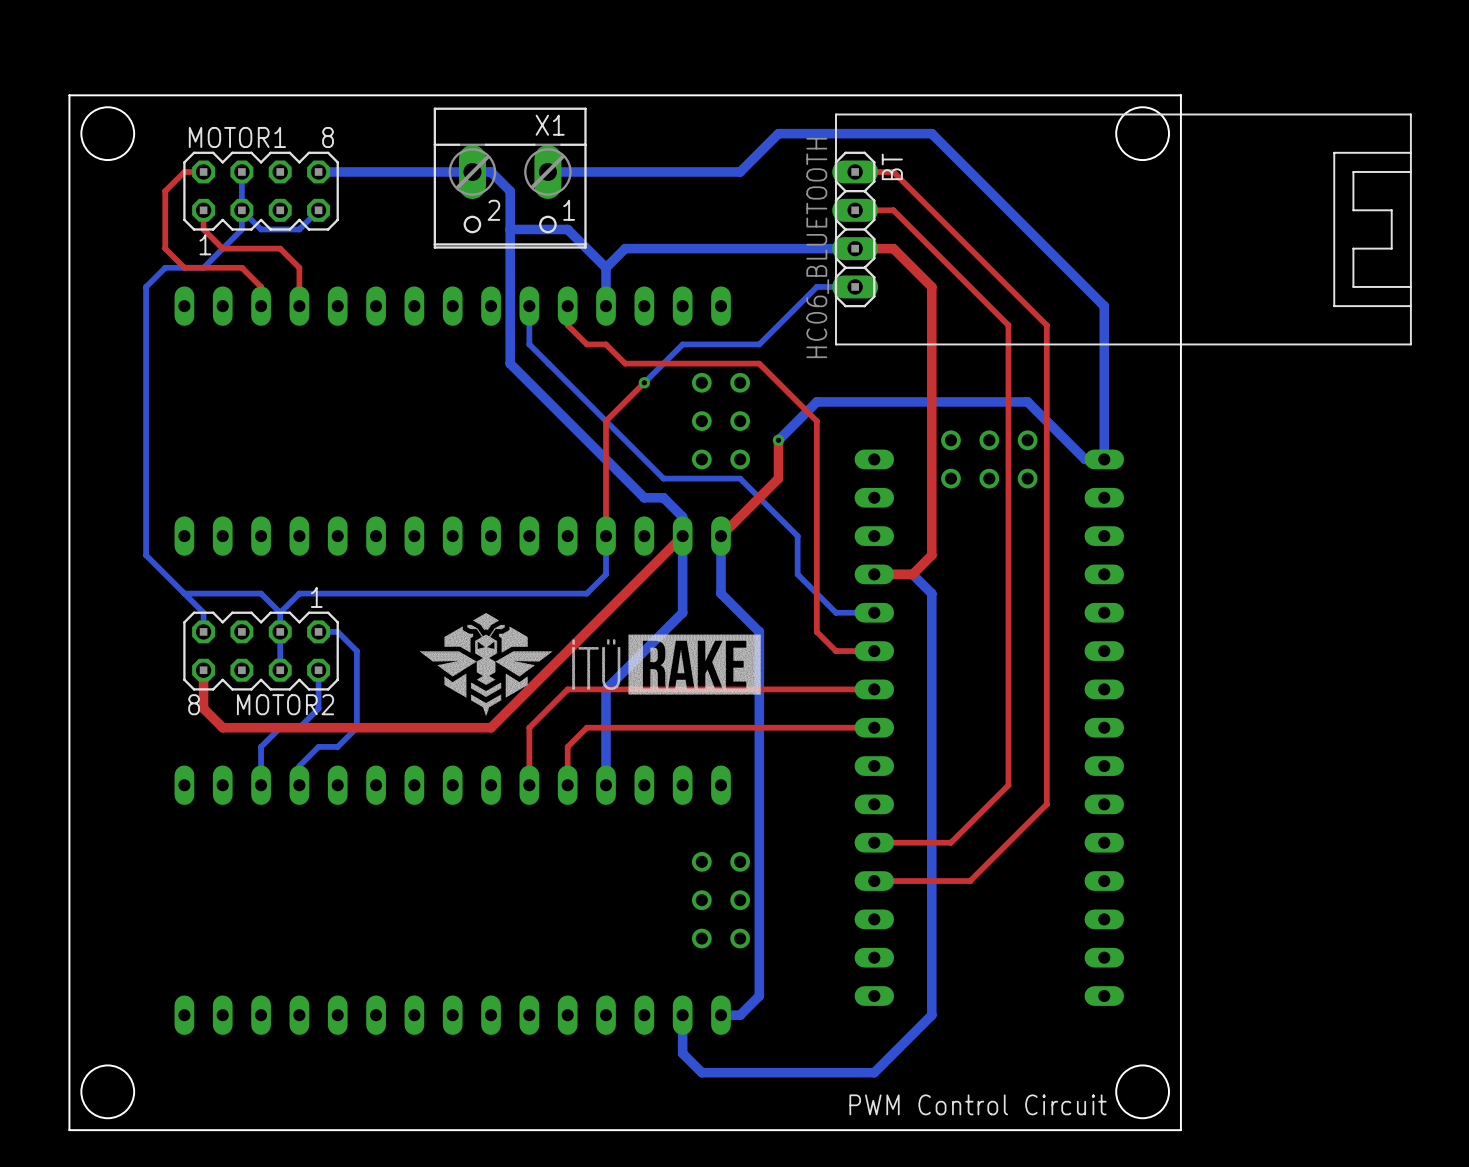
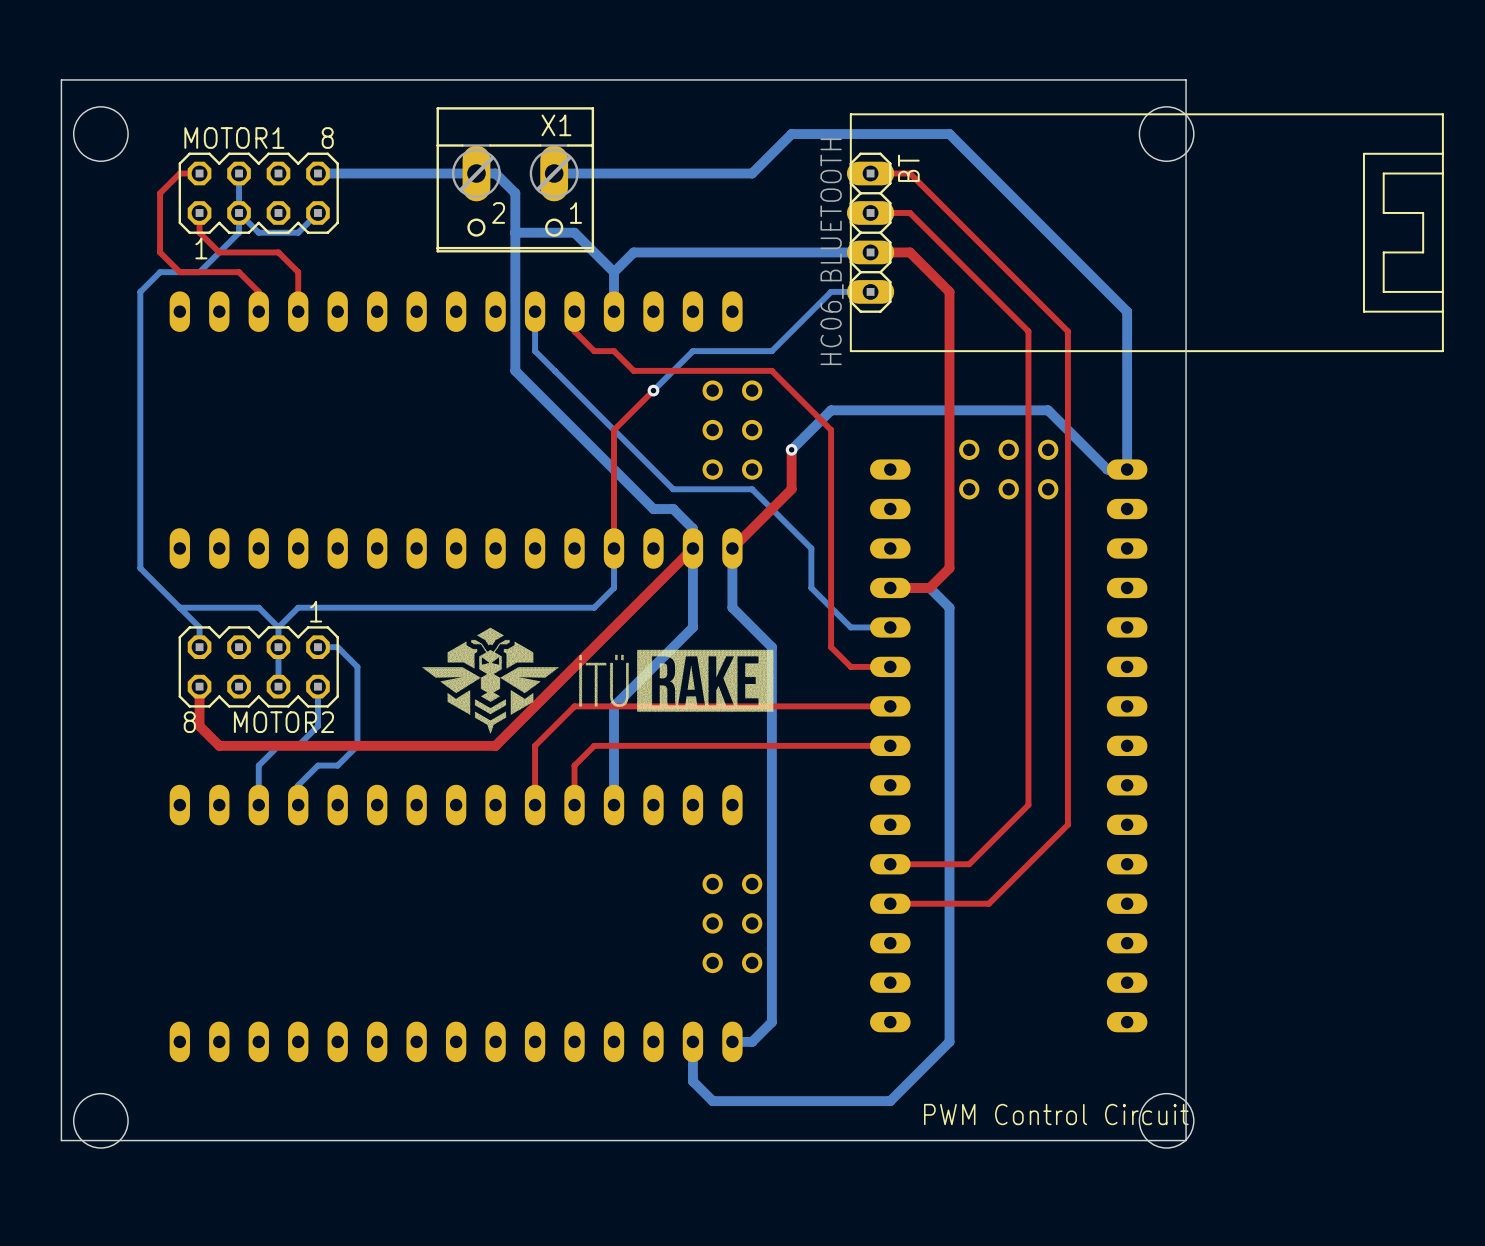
board edge: (69, 95) (1180, 95) (1180, 1130) (69, 1130) (69, 1111) -> (61, 94) (61, 79) (1186, 79) (1186, 1140) (61, 1140)
text position: PWM Control Circuit (978, 1104) -> PWM Control Circuit (1056, 1114)

